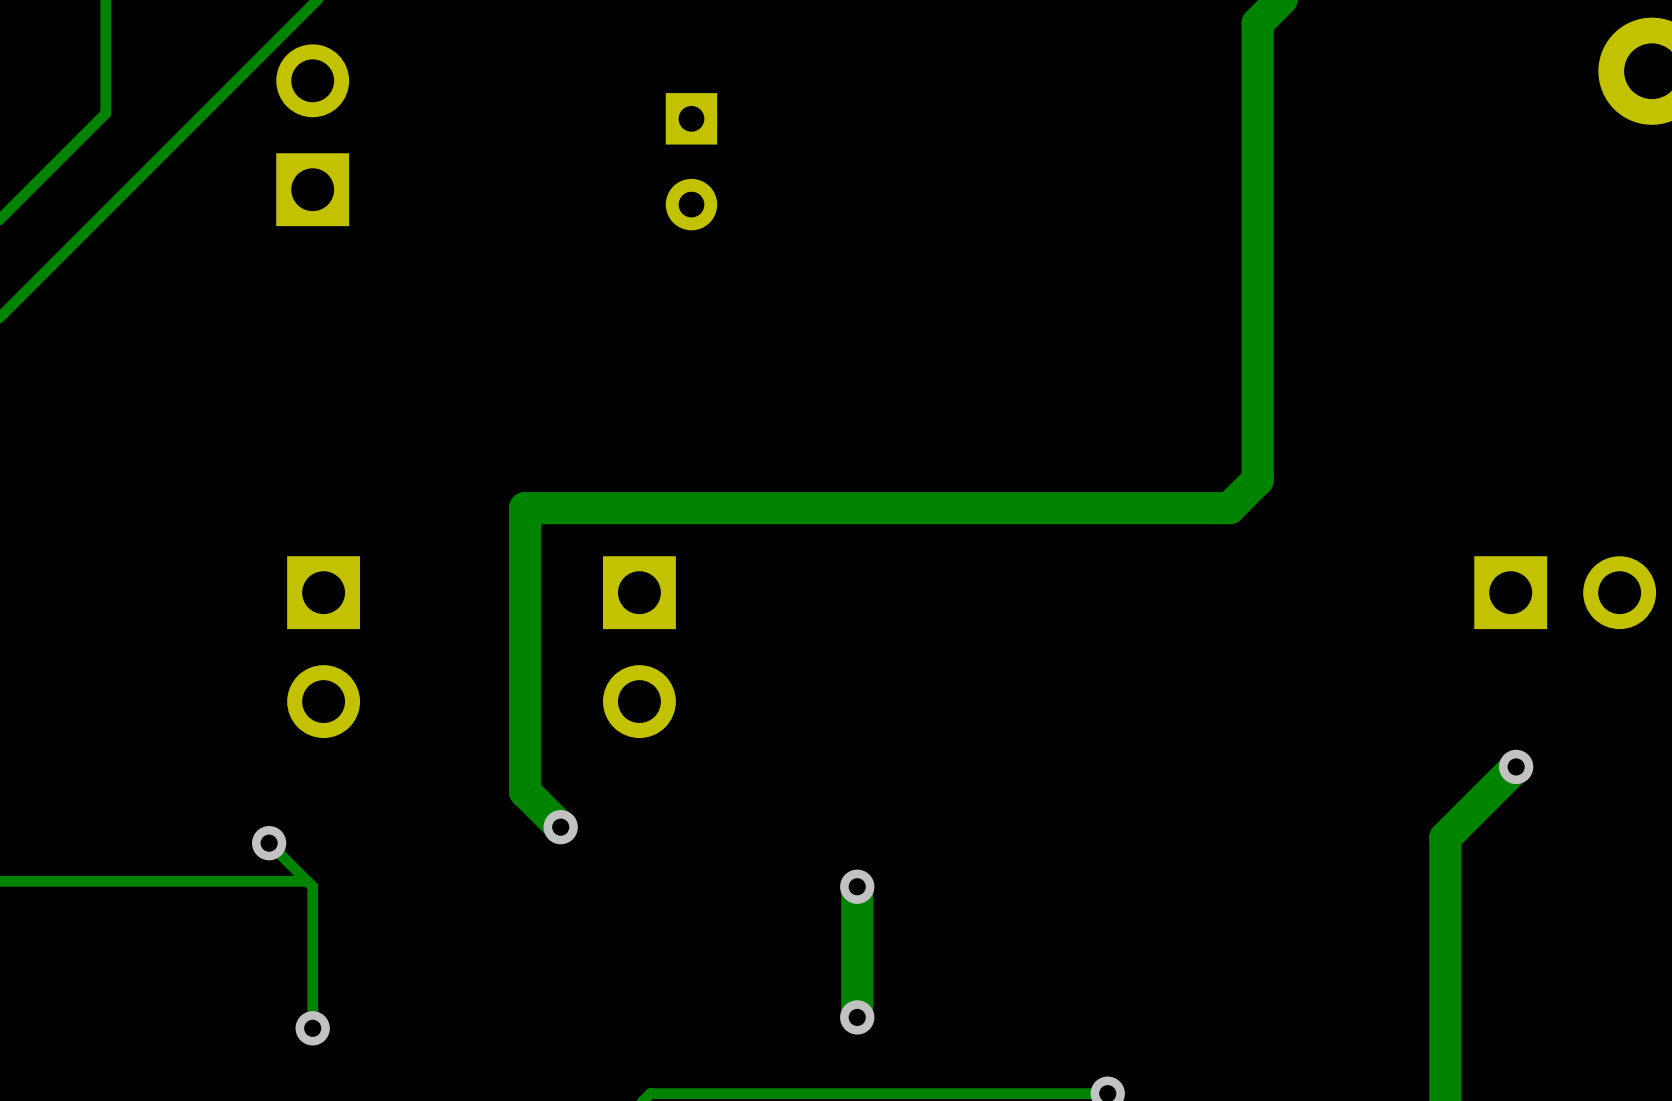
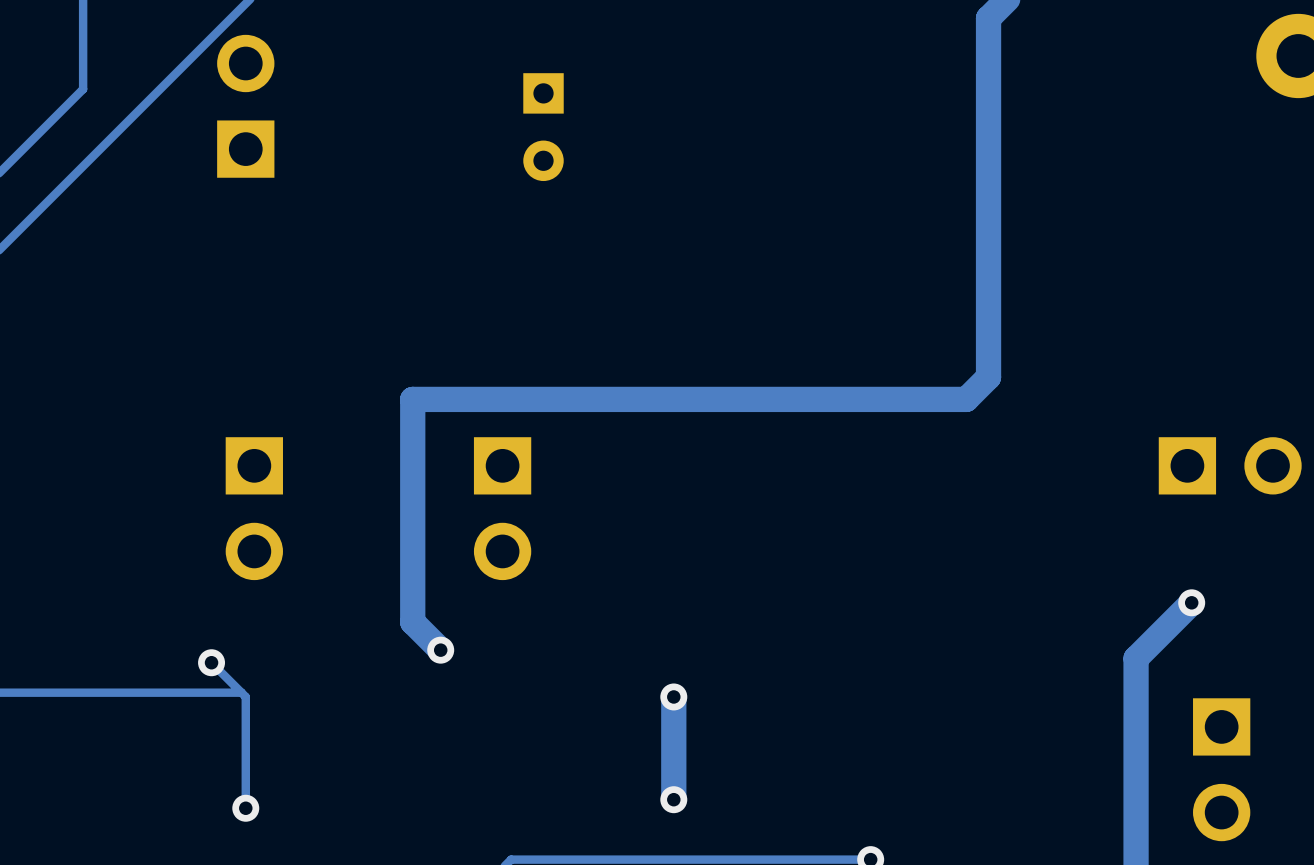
part: none -> (1221, 769)

